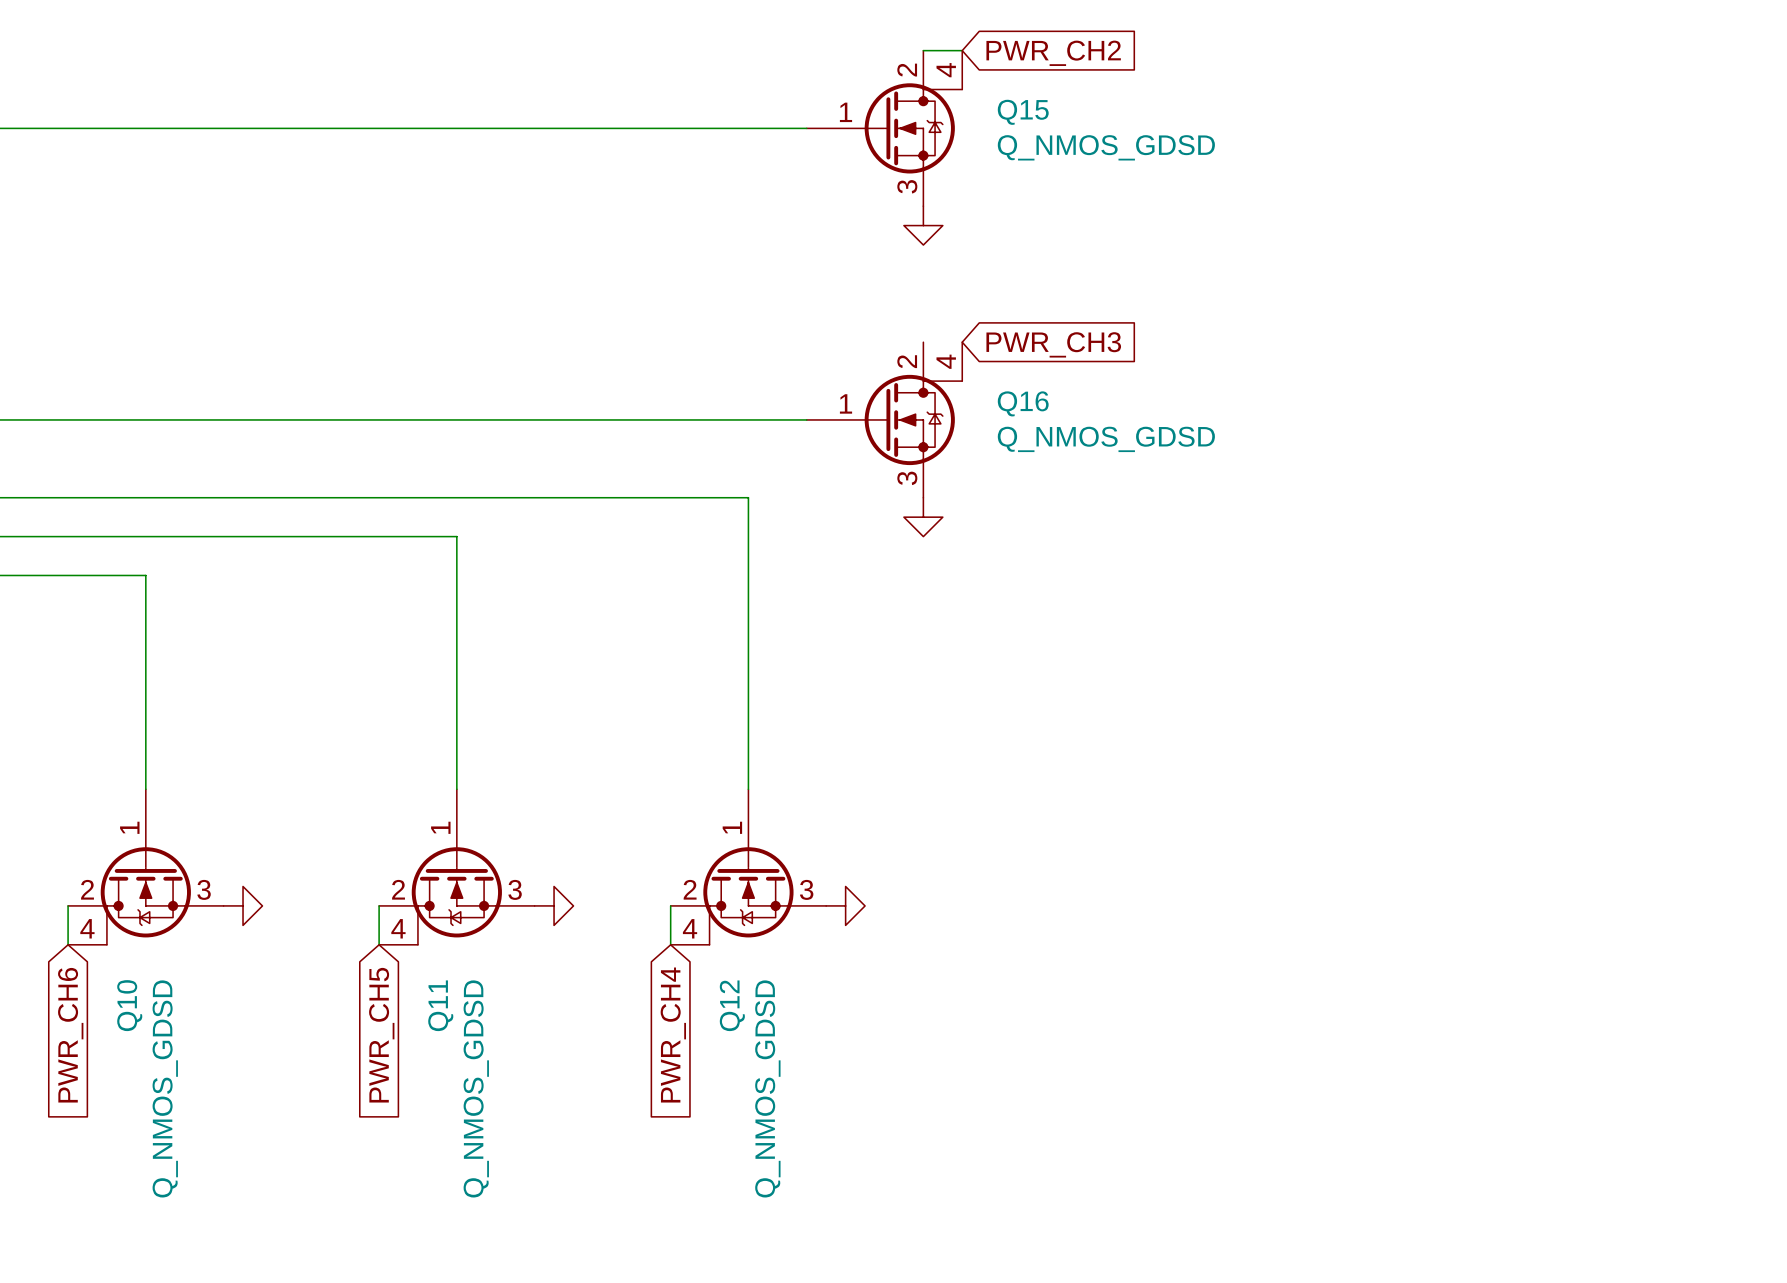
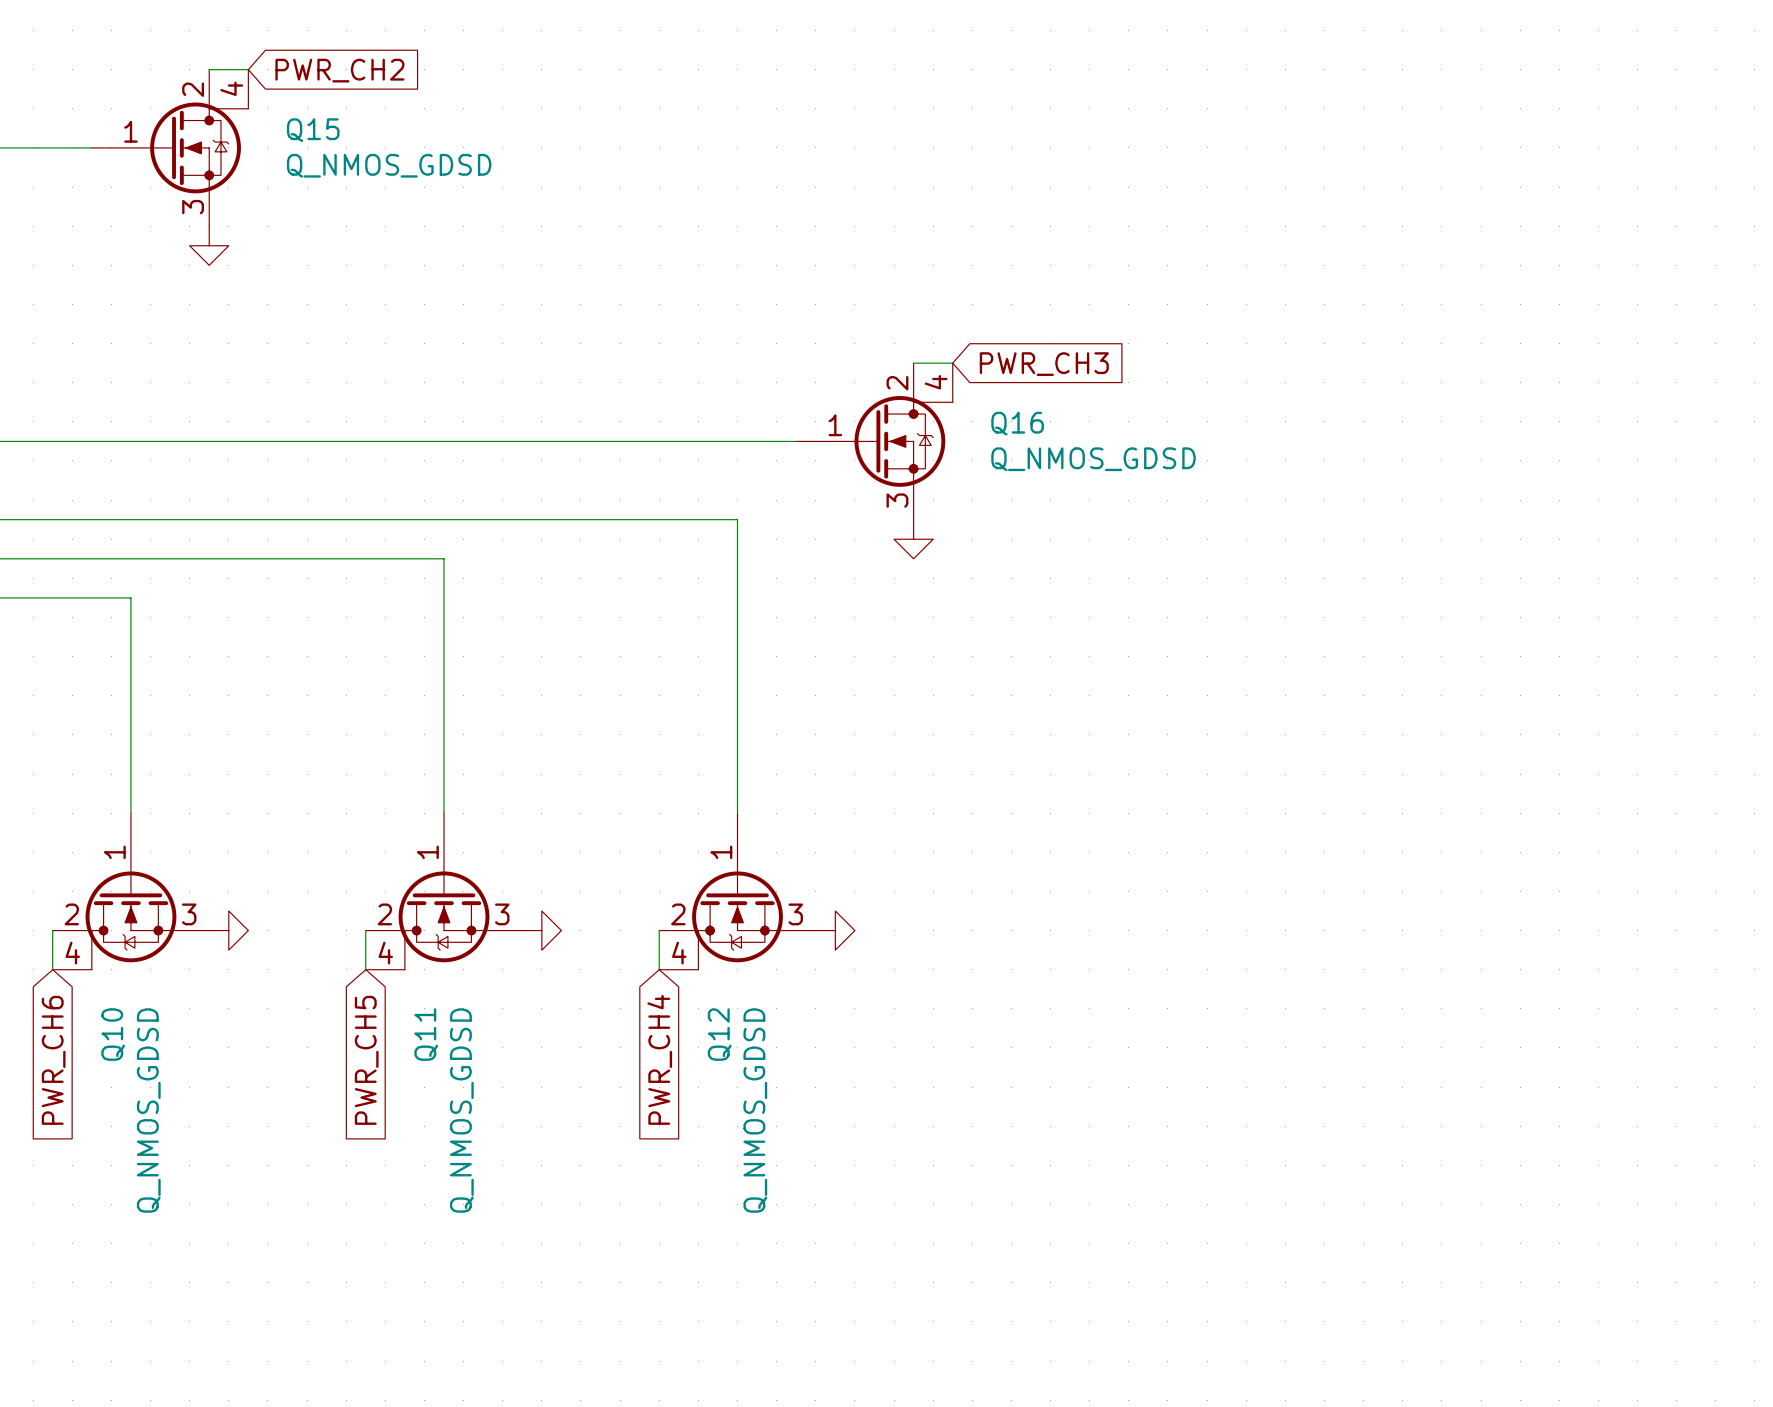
wire: none -> (209, 69) (248, 69)
wire: (923, 50) (962, 50) -> (913, 363) (952, 363)
global label: none -> PWR_CH2 (339, 70)
global label: PWR_CH2 (1053, 53) -> none
wire: (106, 128) (806, 128) -> none
Q15 position: (884, 128) -> (170, 147)
power symbol: none -> (209, 245)
power symbol: (923, 225) -> none

